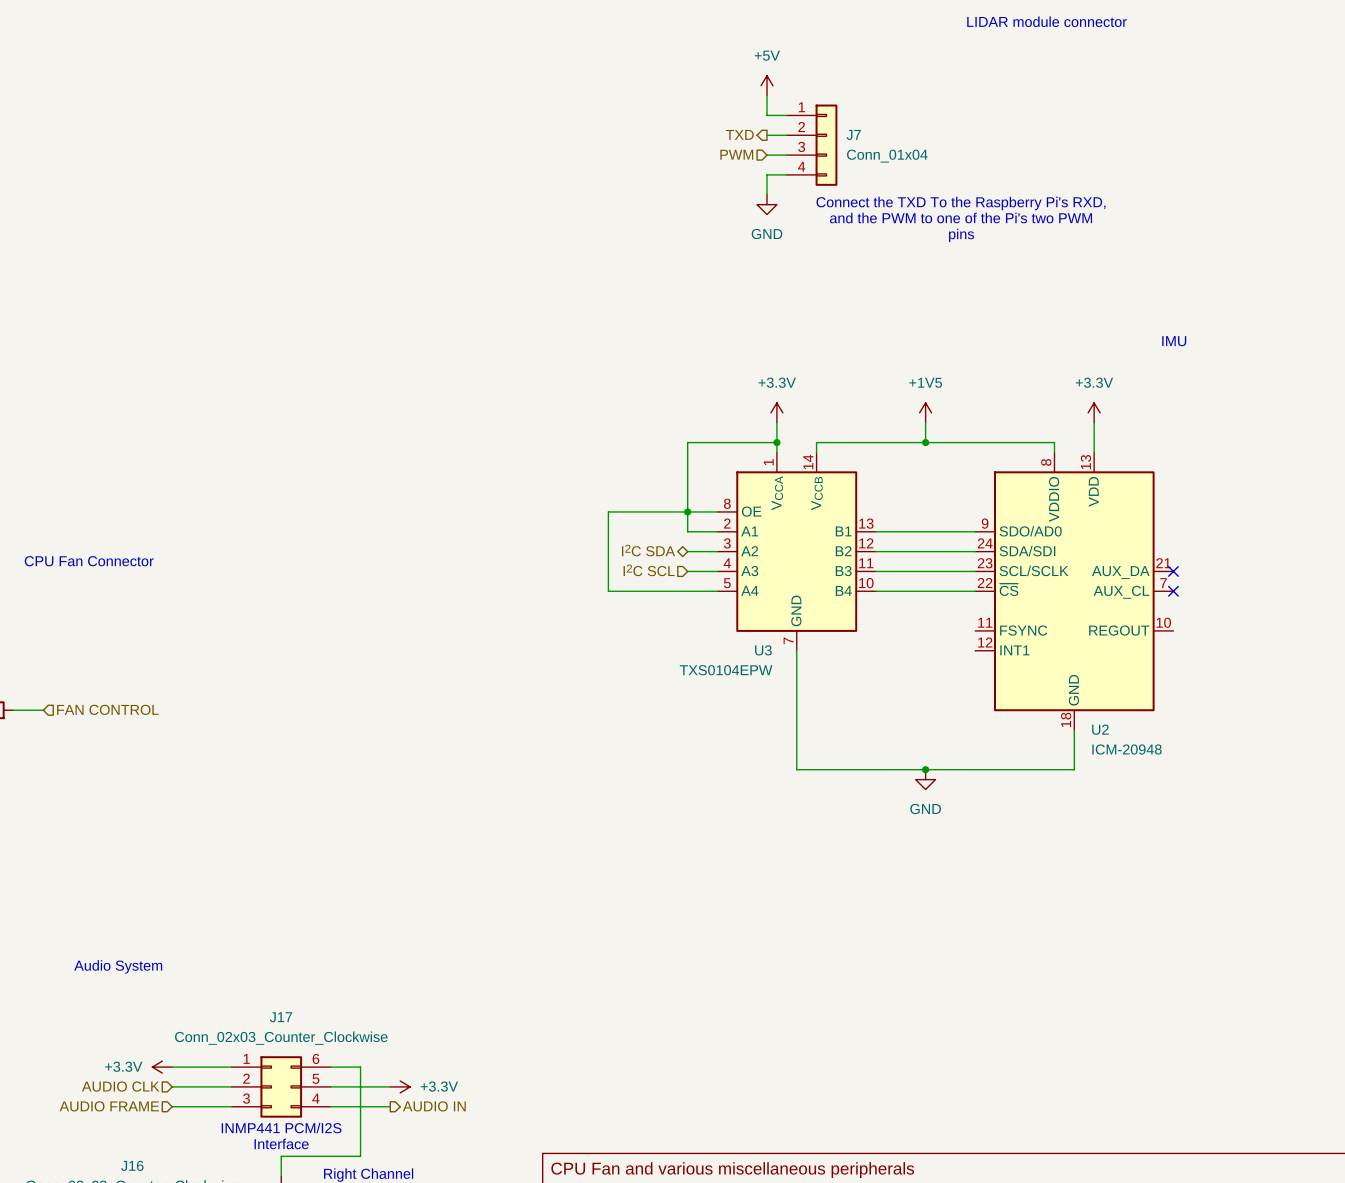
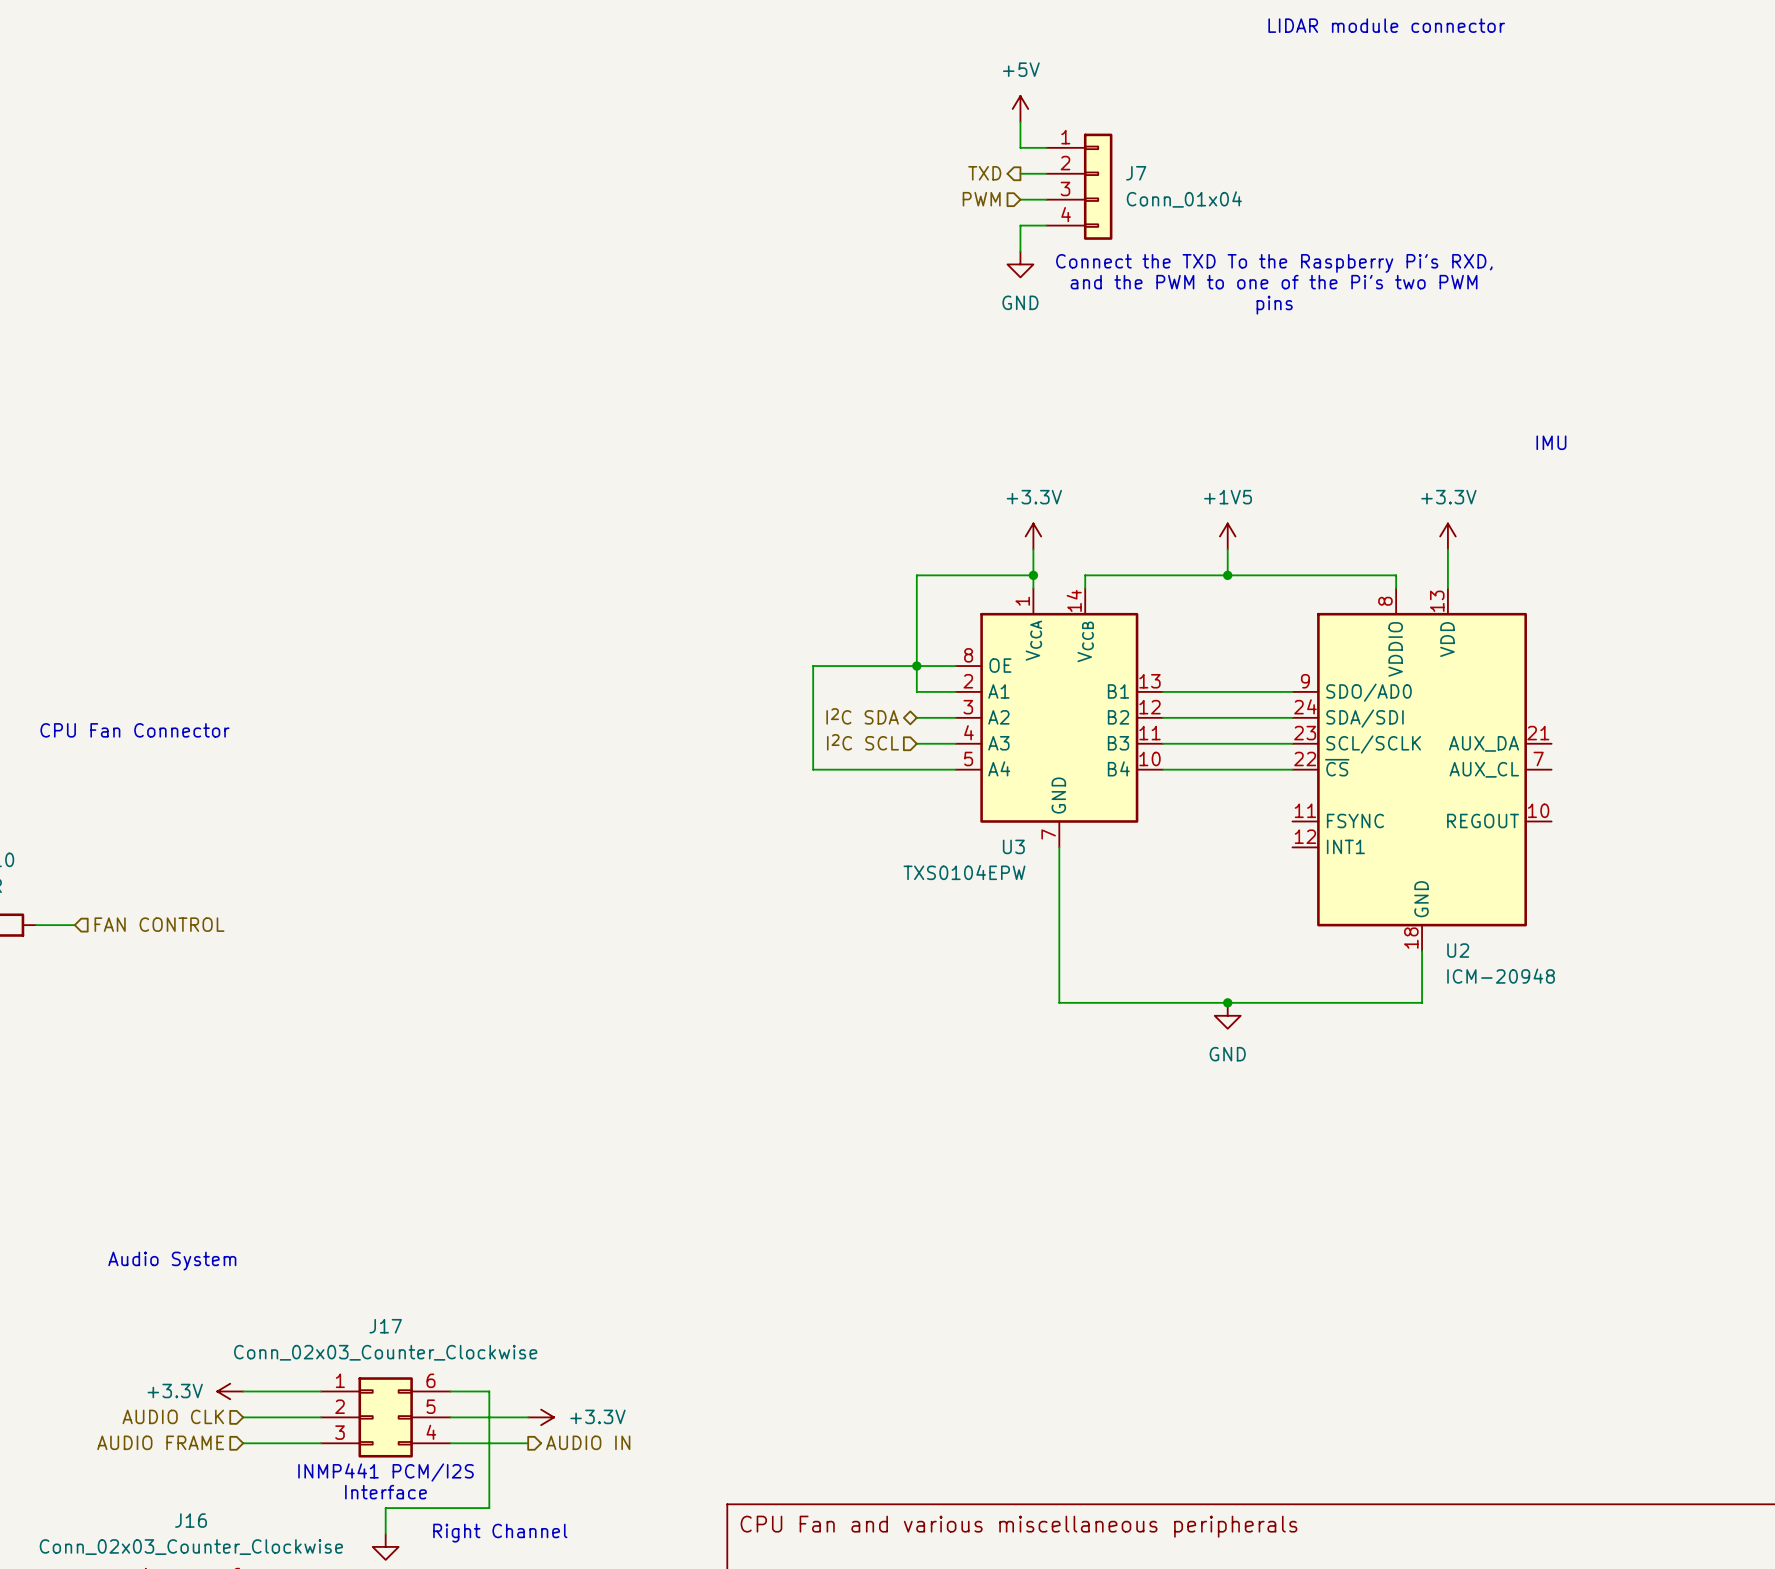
no-connect mark: (1173, 571) -> none
no-connect mark: (1173, 591) -> none

